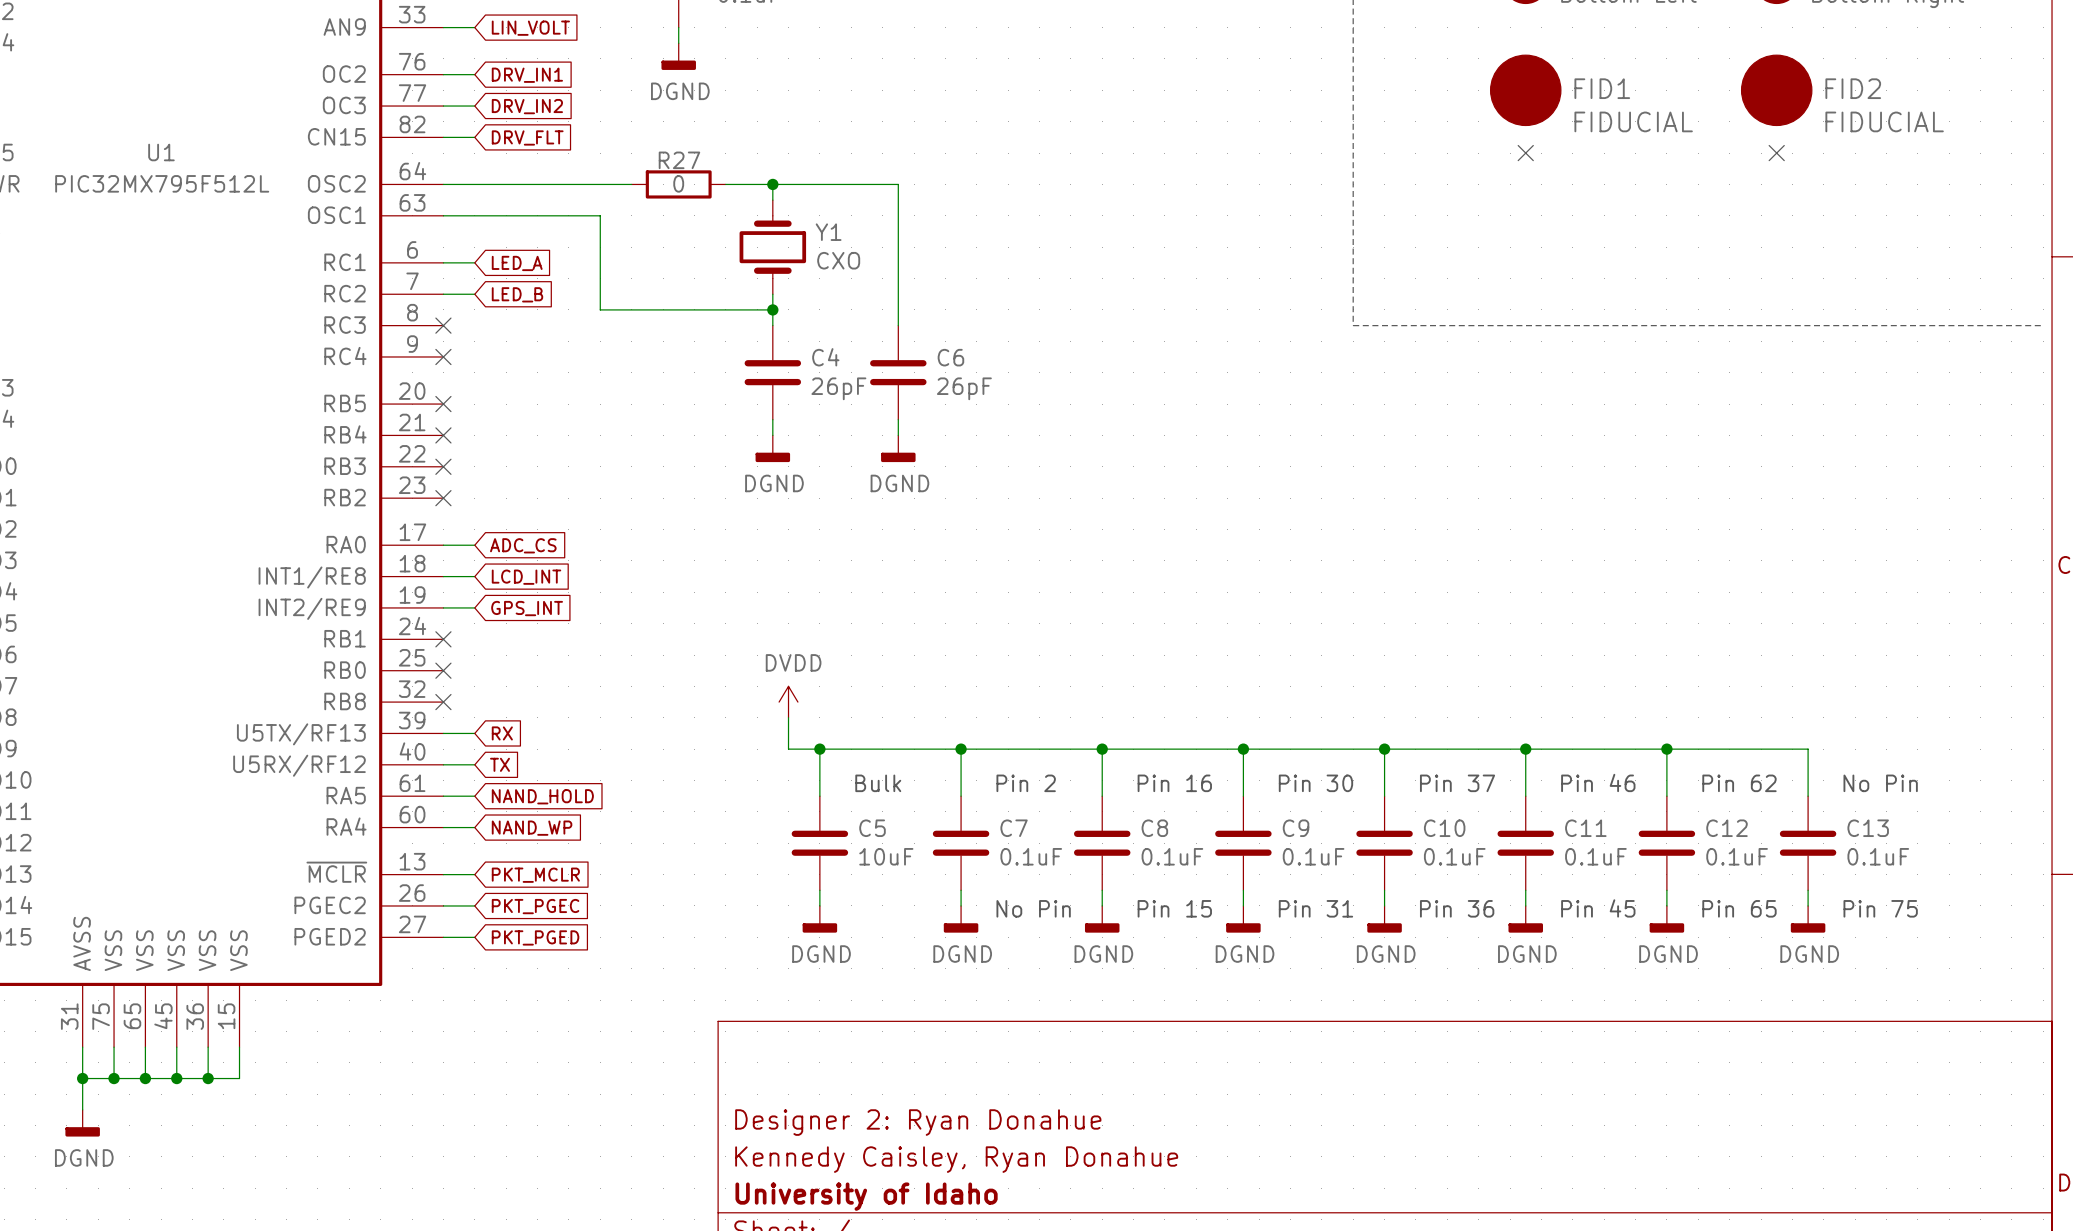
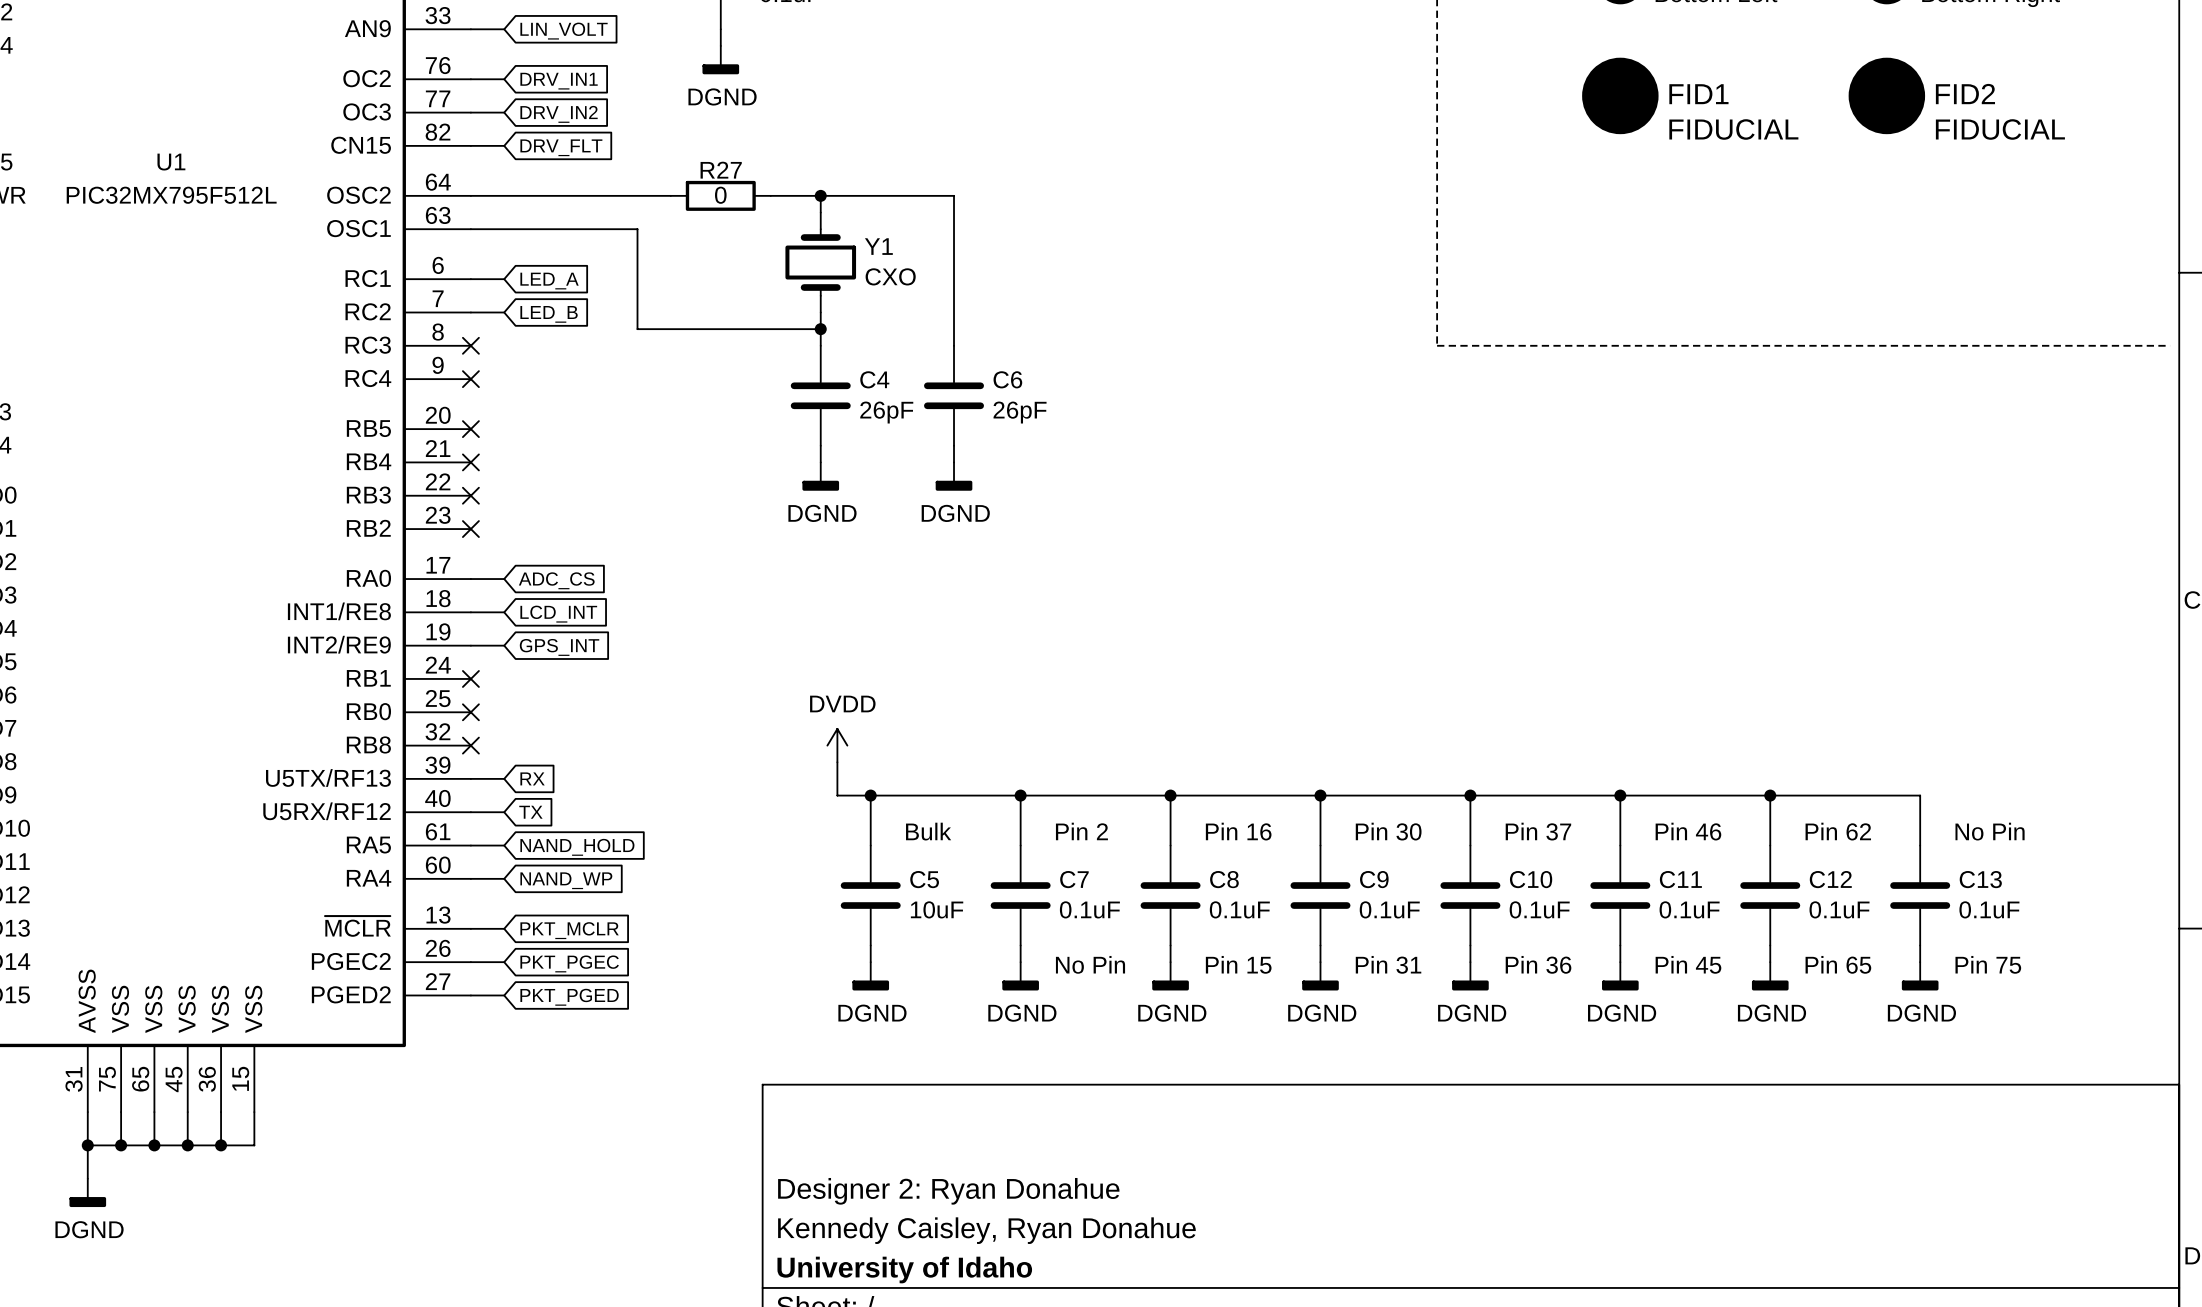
no-connect mark: (1525, 153) -> none
no-connect mark: (1776, 153) -> none

